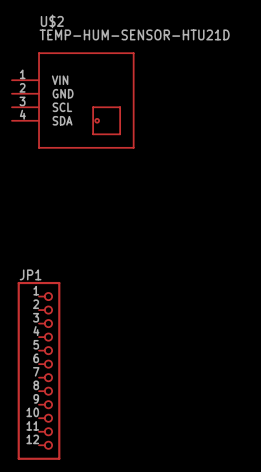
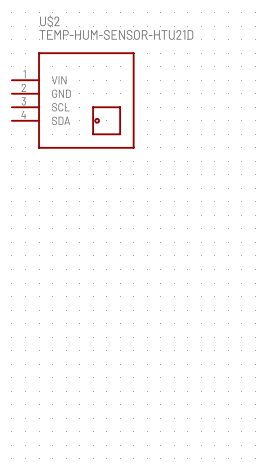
JP1: (39, 370) -> none

